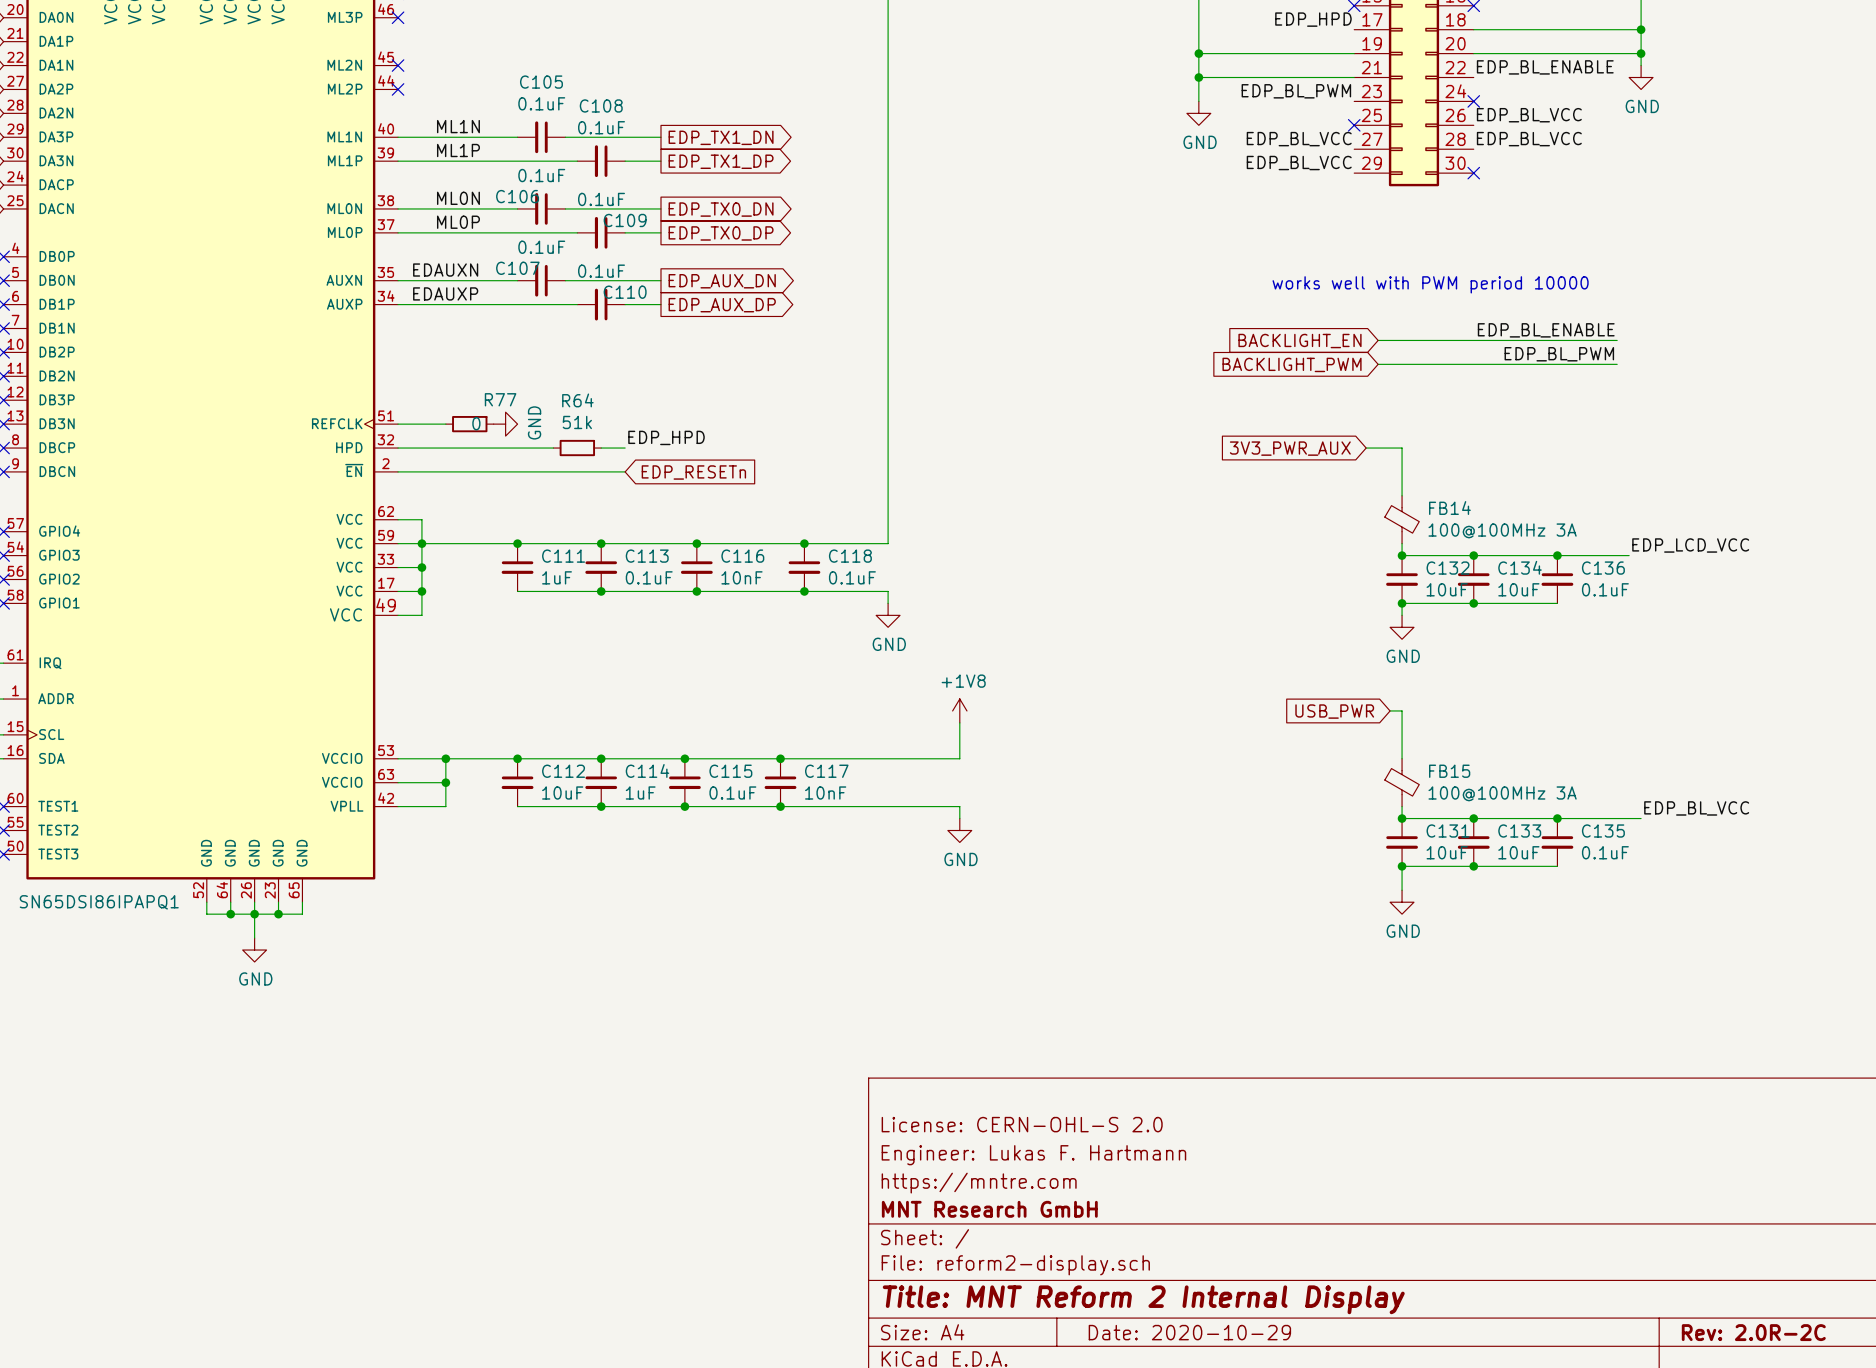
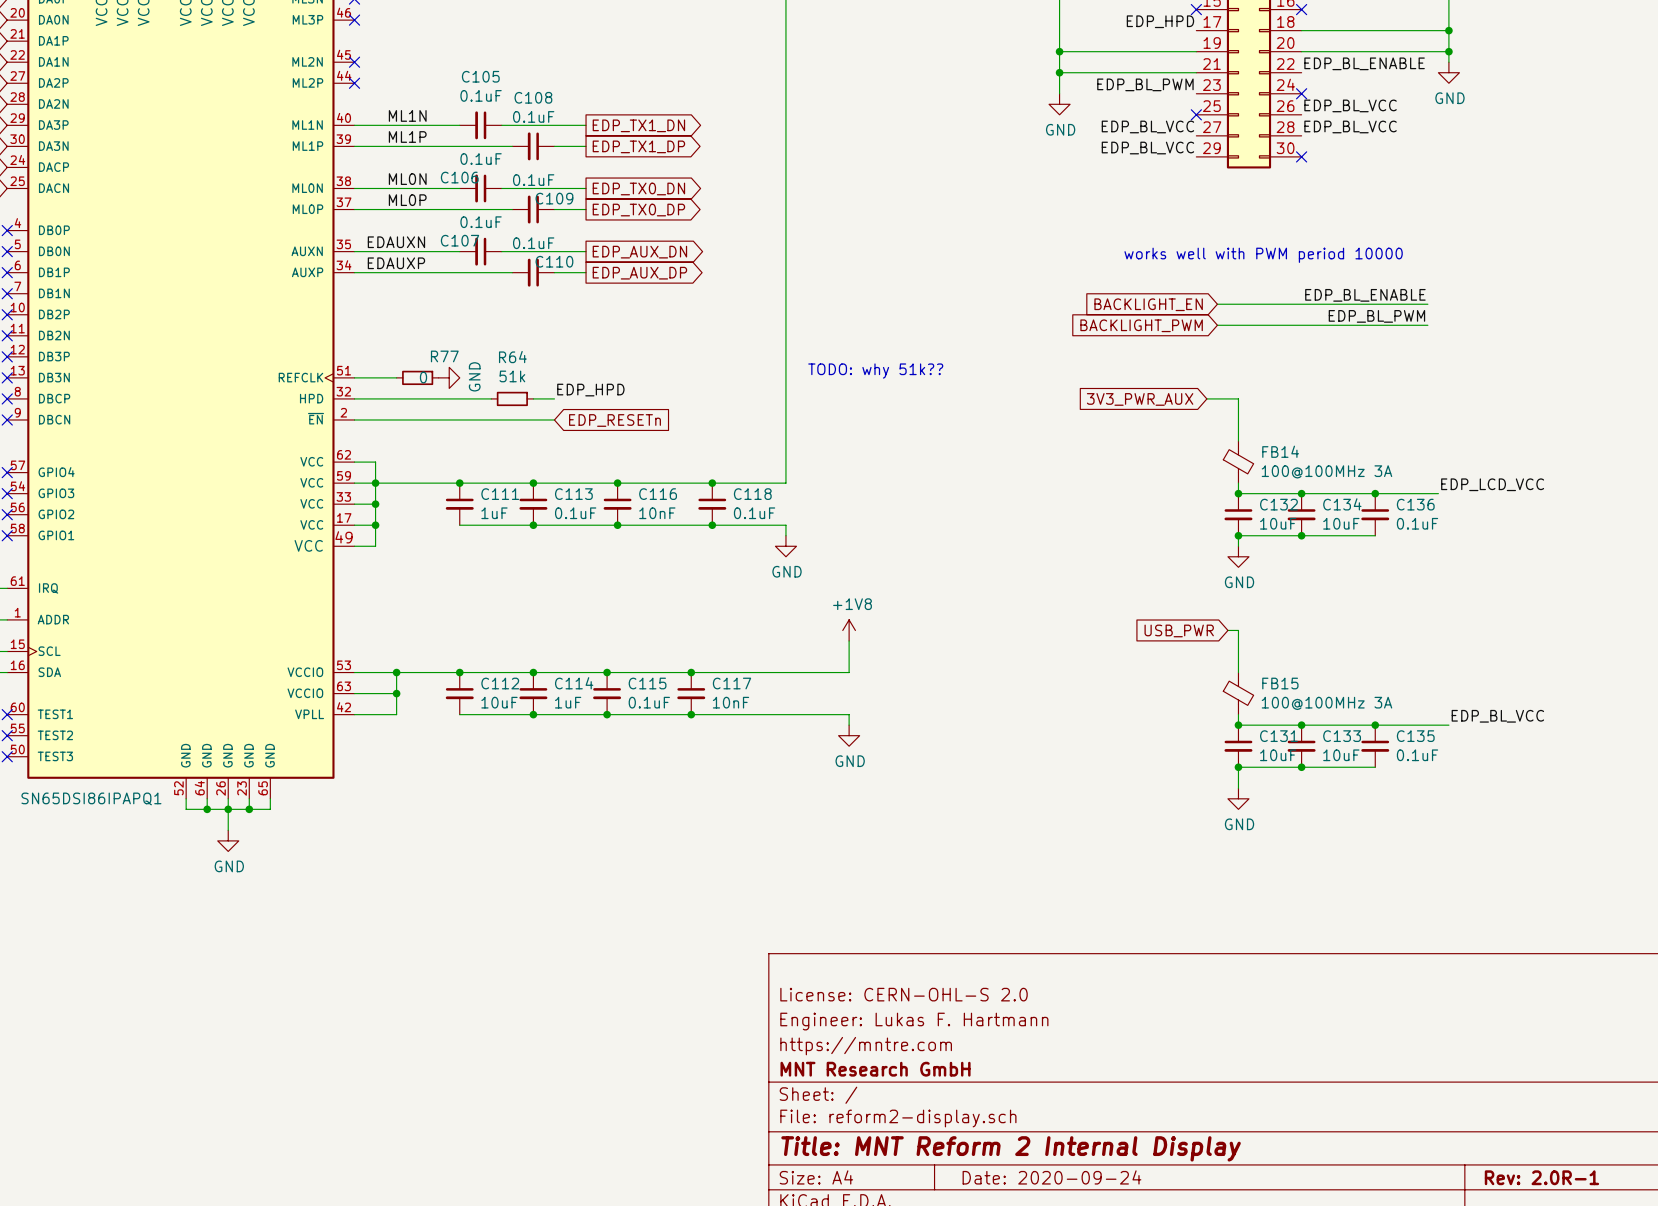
text: none -> TODO: why 51k?? (875, 371)
title block: Date: 2020-10-29 (1189, 1332) -> Date: 2020-09-24 (1051, 1177)
title block: Rev: 2.0R-2C (1753, 1332) -> Rev: 2.0R-1 (1541, 1177)

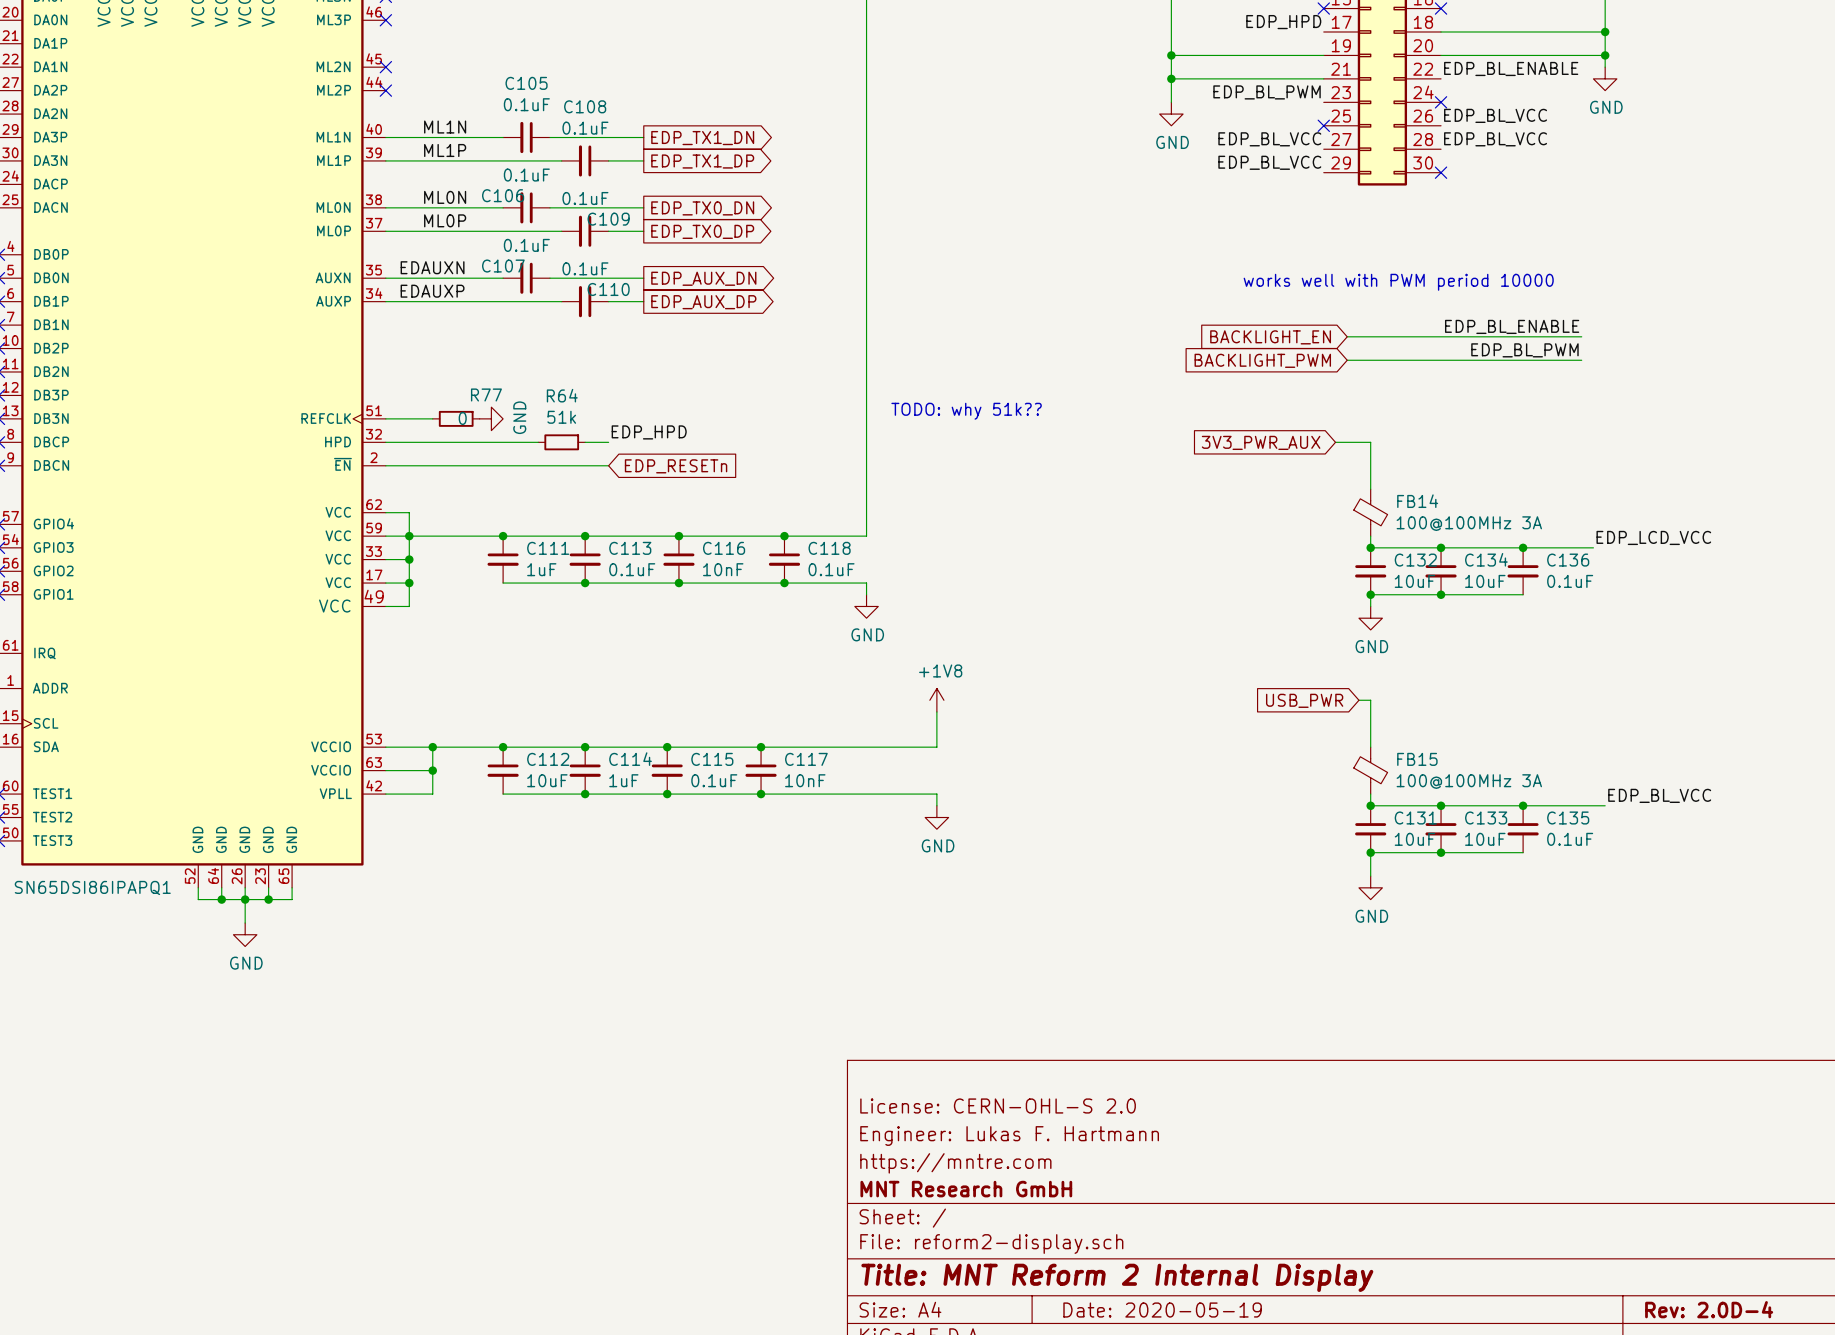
title block: Date: 2020-09-24 (1051, 1177) -> Date: 2020-05-19 (1162, 1310)
title block: Rev: 2.0R-1 (1541, 1177) -> Rev: 2.0D-4 (1709, 1309)

